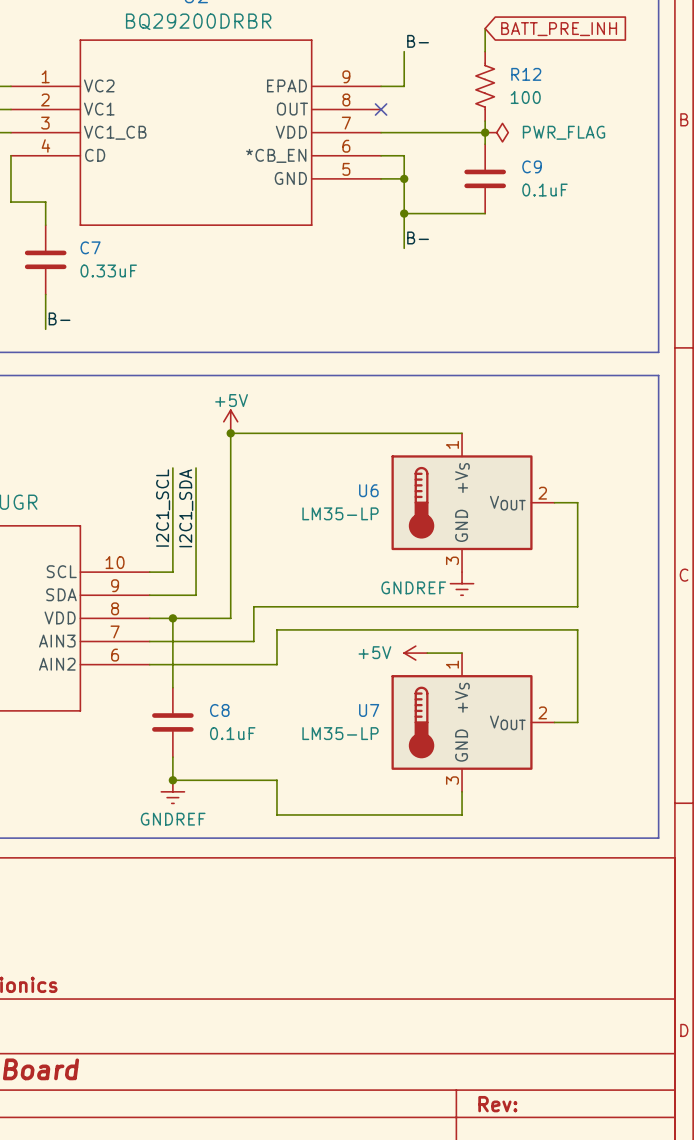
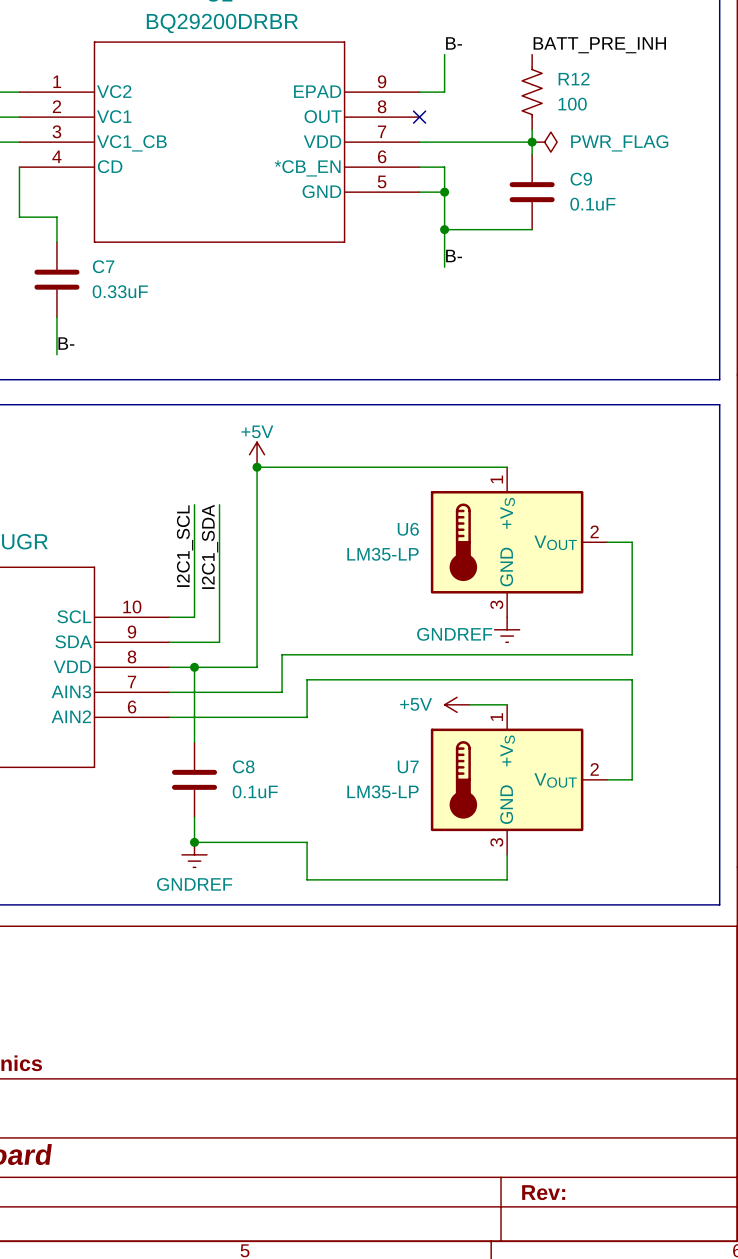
wire: (485, 28) (485, 51) -> none
global label: BATT_PRE_INH (559, 29) -> none
label: none -> BATT_PRE_INH (599, 45)

